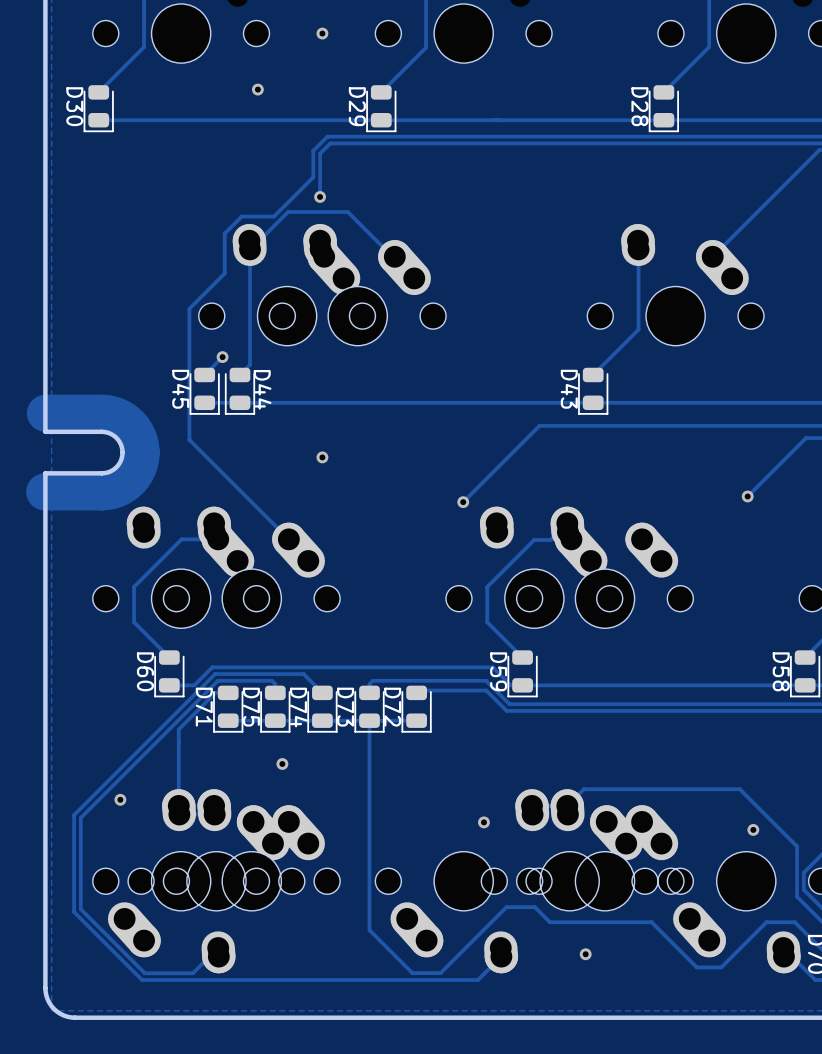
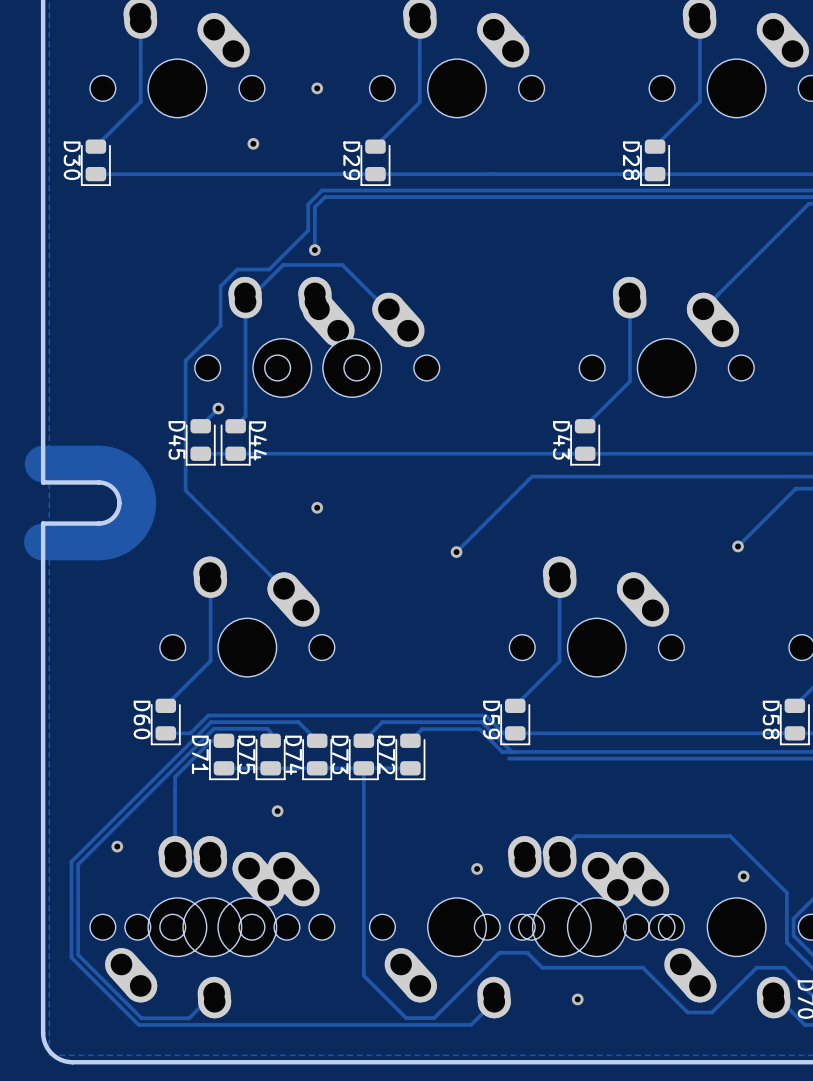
track: (567, 523) (550, 540) (534, 540) (487, 586) (487, 622) (522, 657) -> (559, 573) (559, 661) (515, 705)
track: (218, 539) (181, 539) (134, 586) (134, 622) (169, 657) -> (210, 581) (210, 660) (165, 705)
part: (181, 567) -> none
part: (534, 567) -> none
track: (486, 681) (372, 680) (369, 684) (369, 692) -> (511, 751) (481, 722) (382, 722) (363, 740)
track: (416, 692) (418, 690) (486, 690) (506, 710) (516, 710) -> (410, 740) (422, 729) (479, 729)

